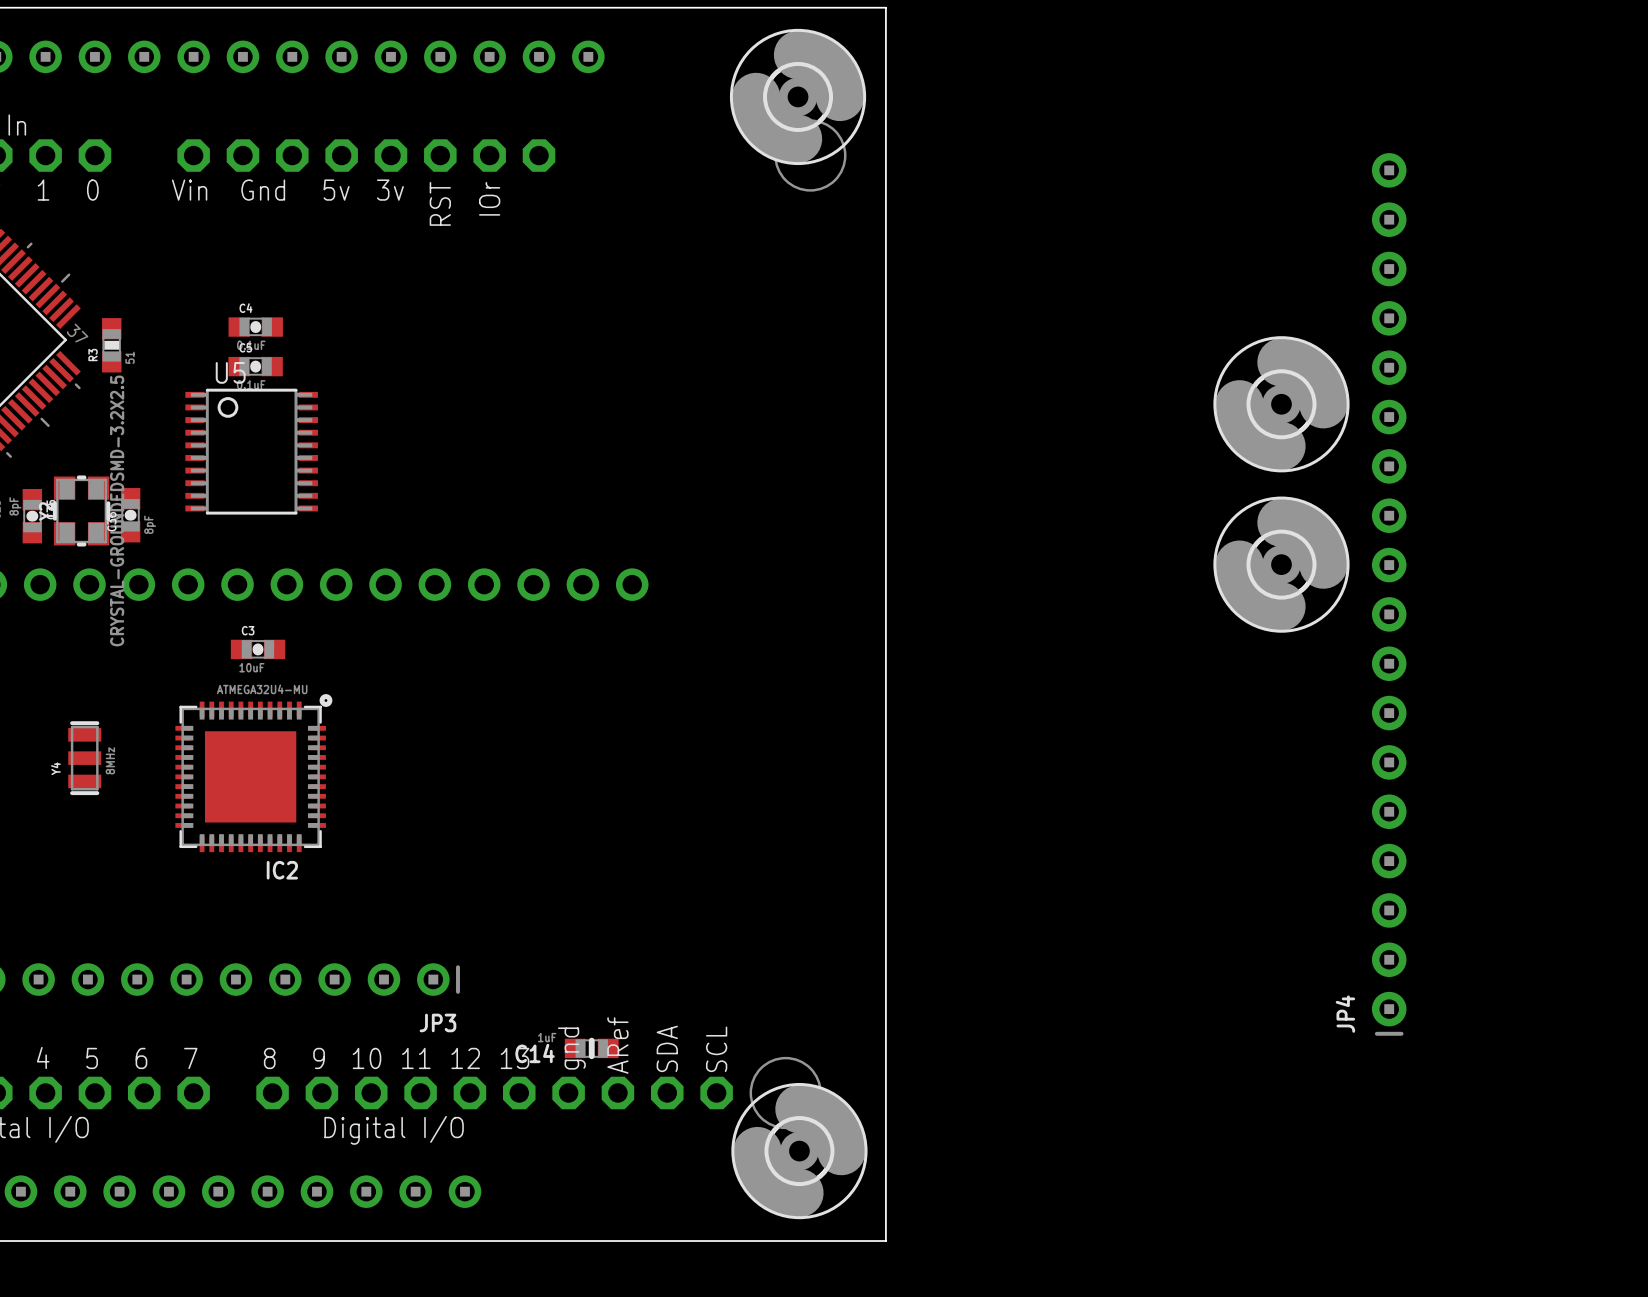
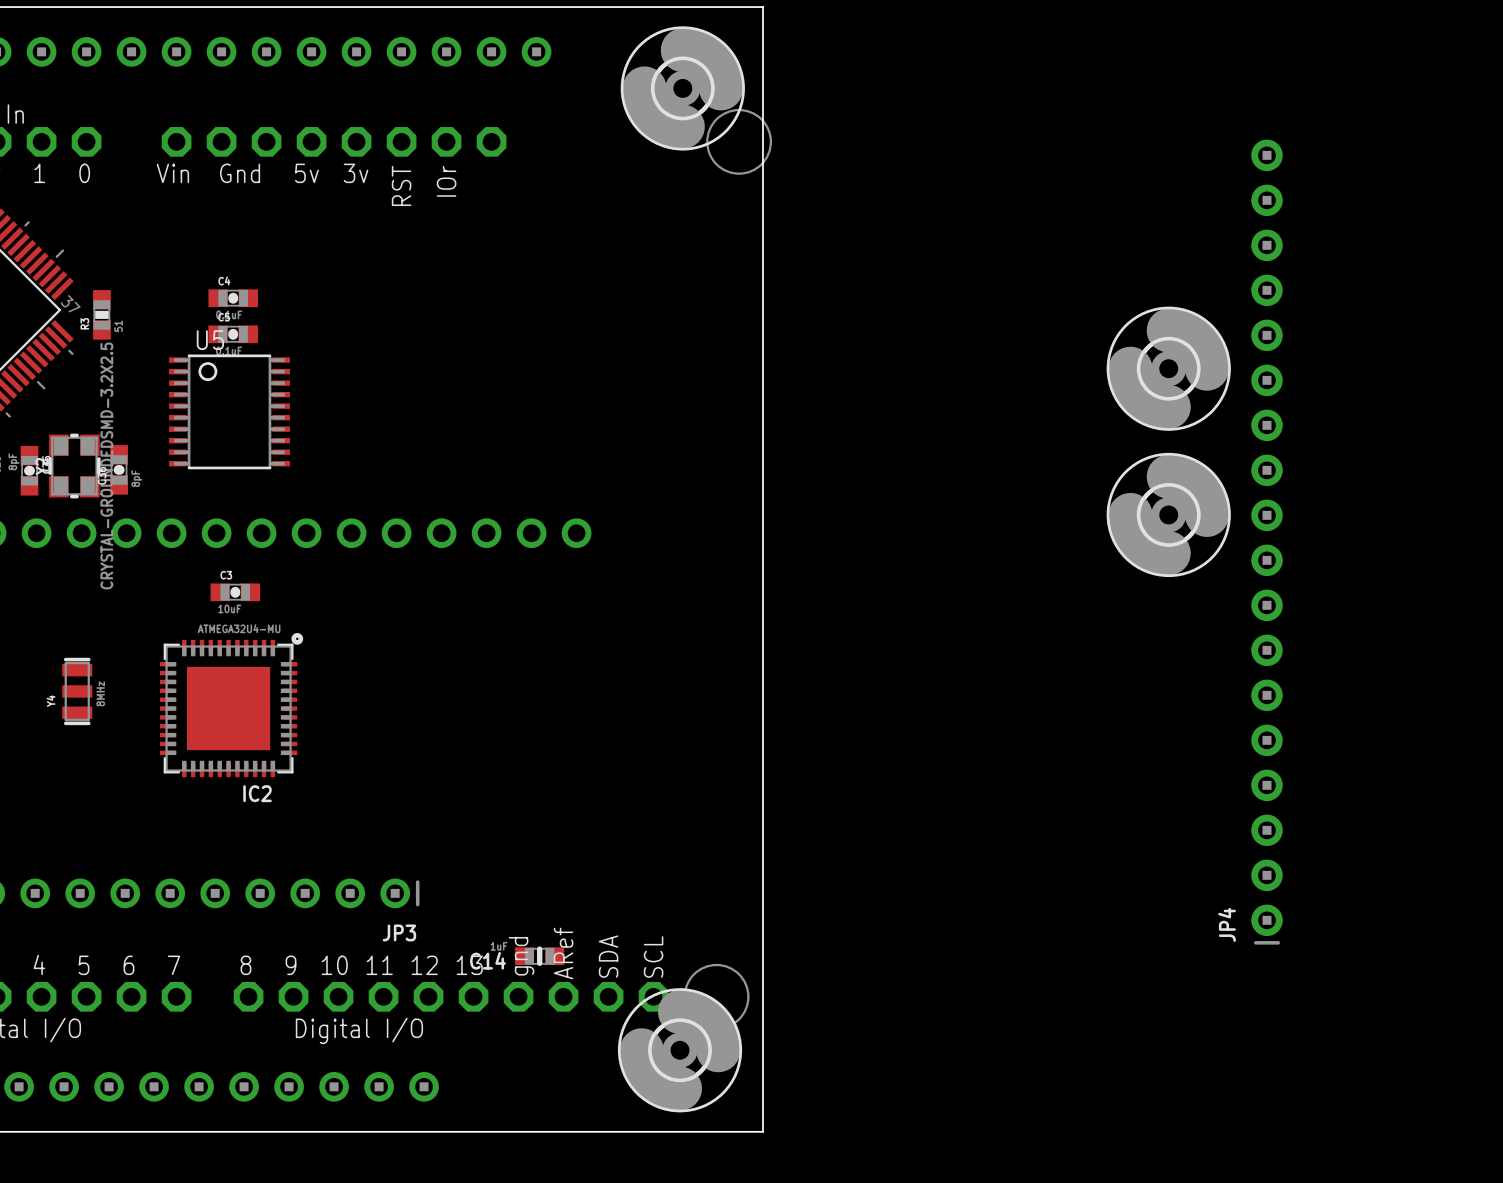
board edge: (836, 7) (885, 7) (885, 1241) (836, 1241) -> (762, 7) (762, 1131)
part position: (798, 96) -> (682, 88)
part position: (799, 1151) -> (680, 1050)

